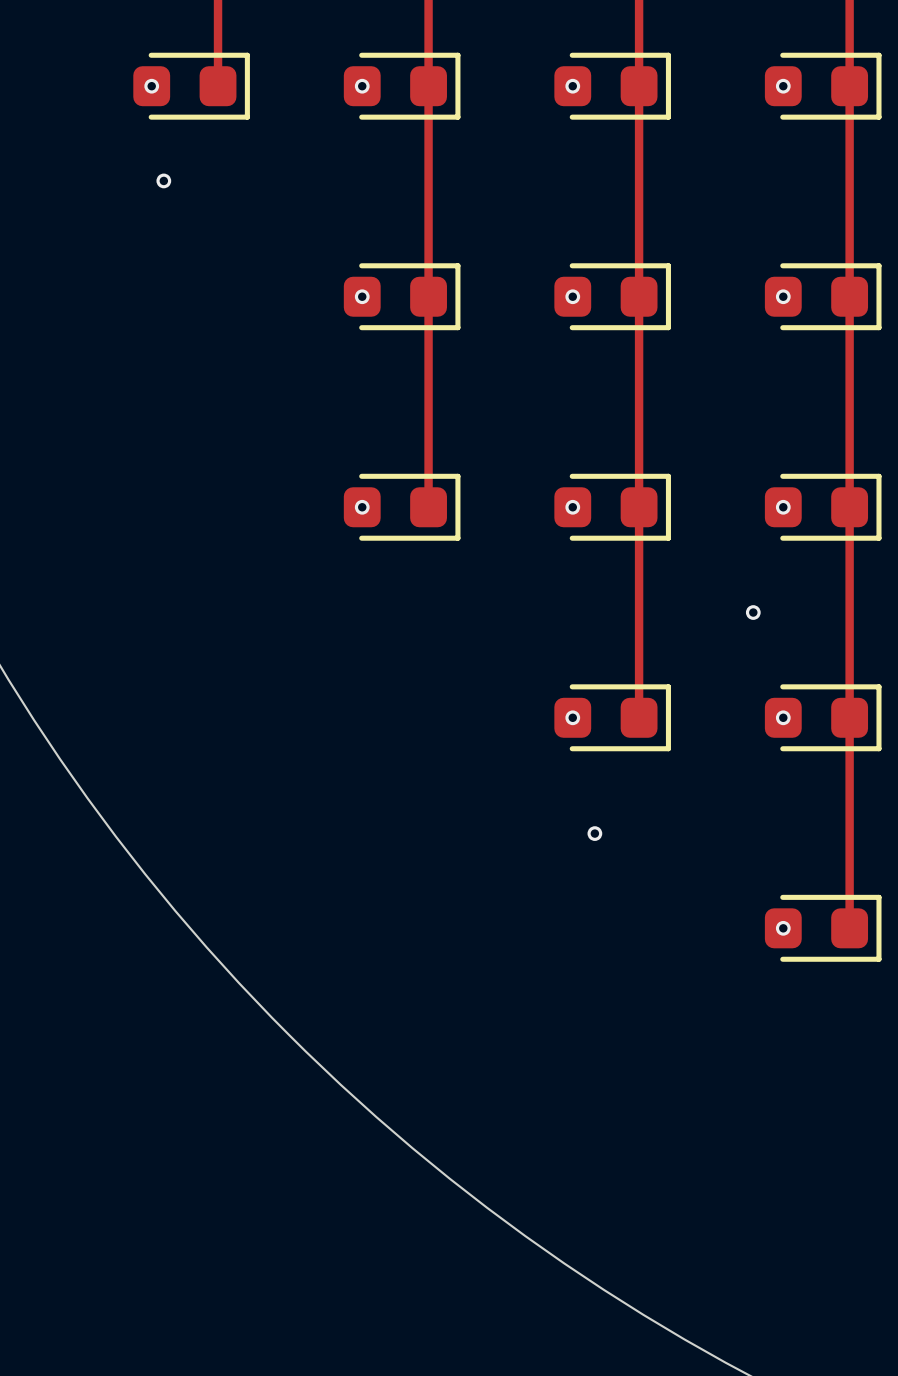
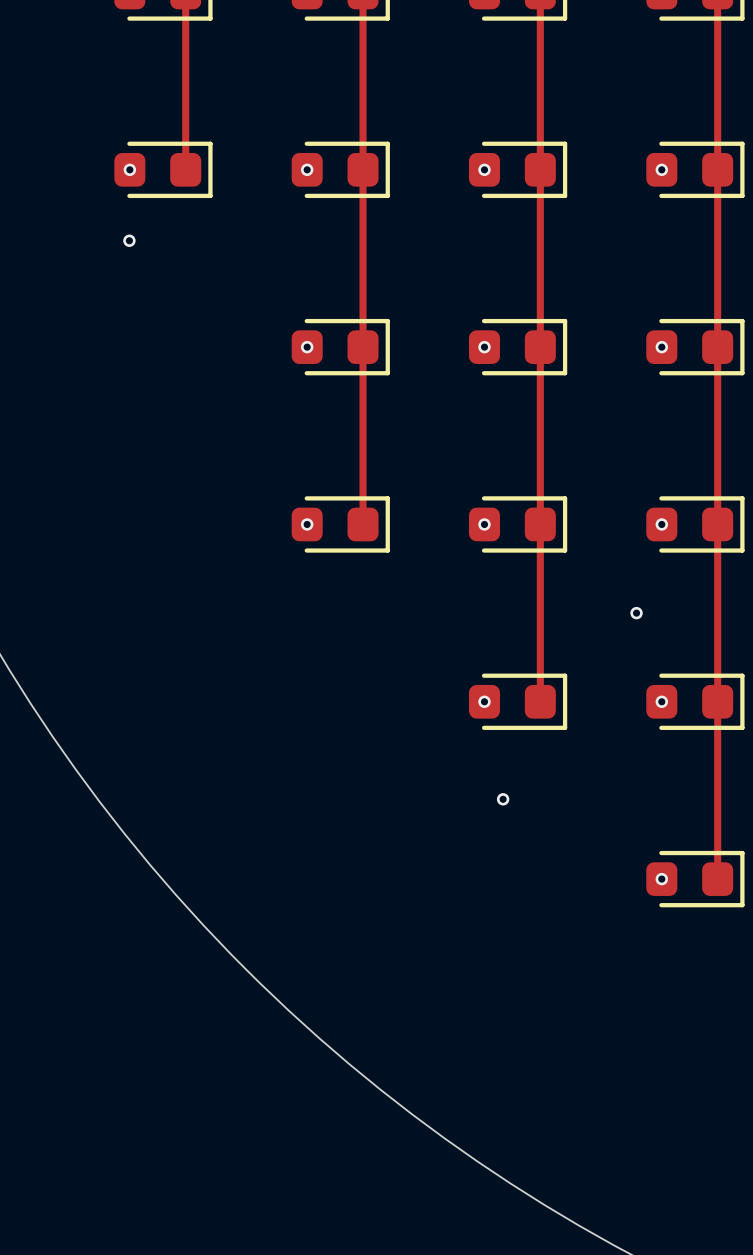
via position: (163, 180) -> (129, 240)

